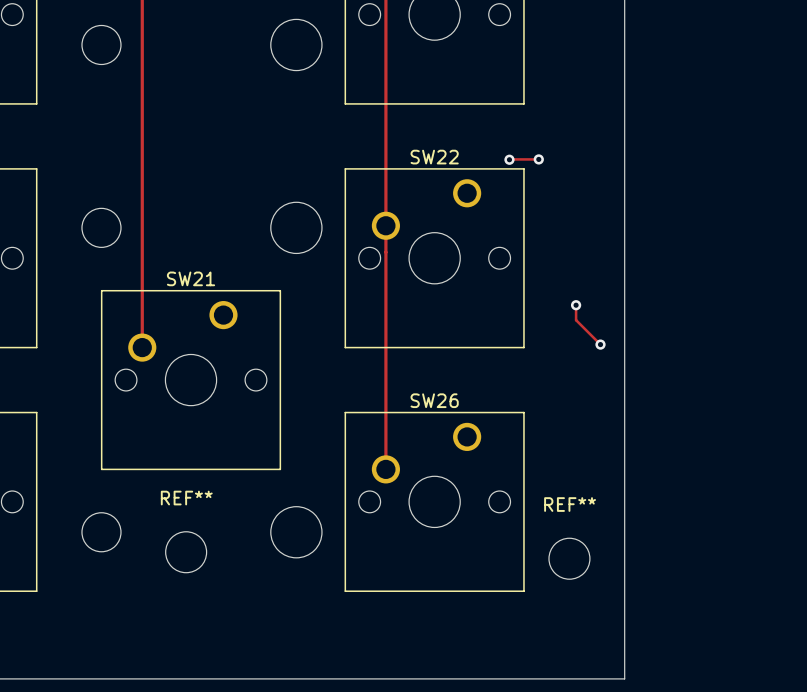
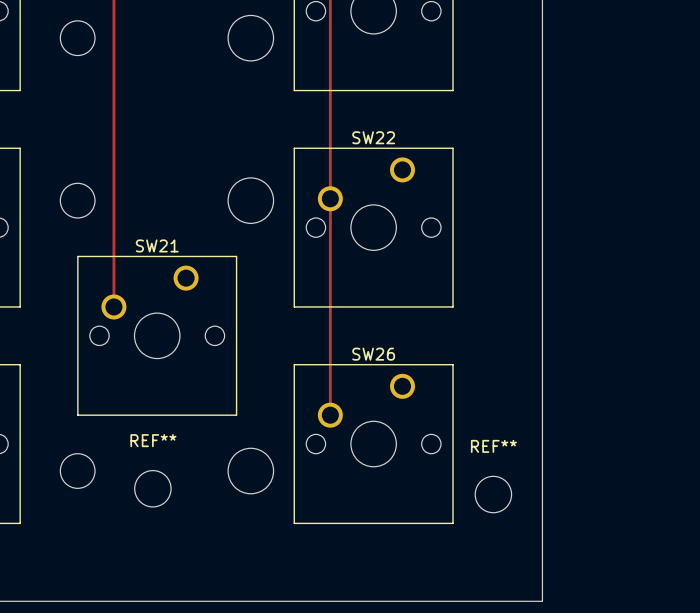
via: (509, 159) -> none
track: (538, 159) (509, 159) -> none
via: (538, 159) -> none
track: (576, 305) (576, 320) (600, 344) -> none
via: (576, 305) -> none
via: (600, 344) -> none

